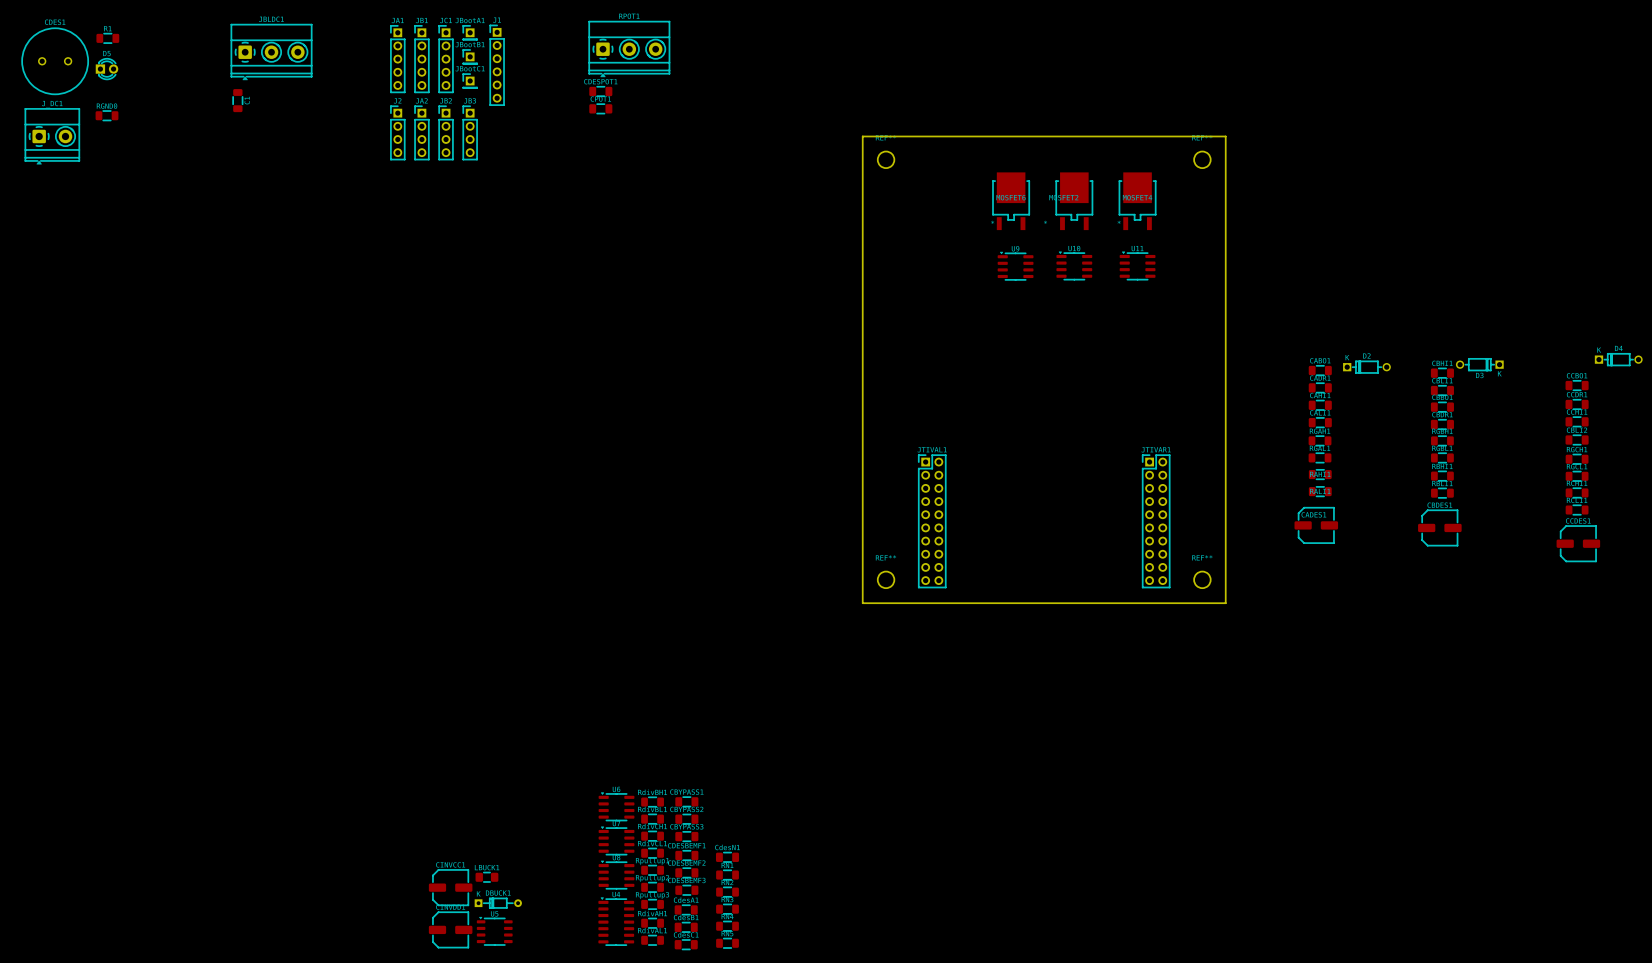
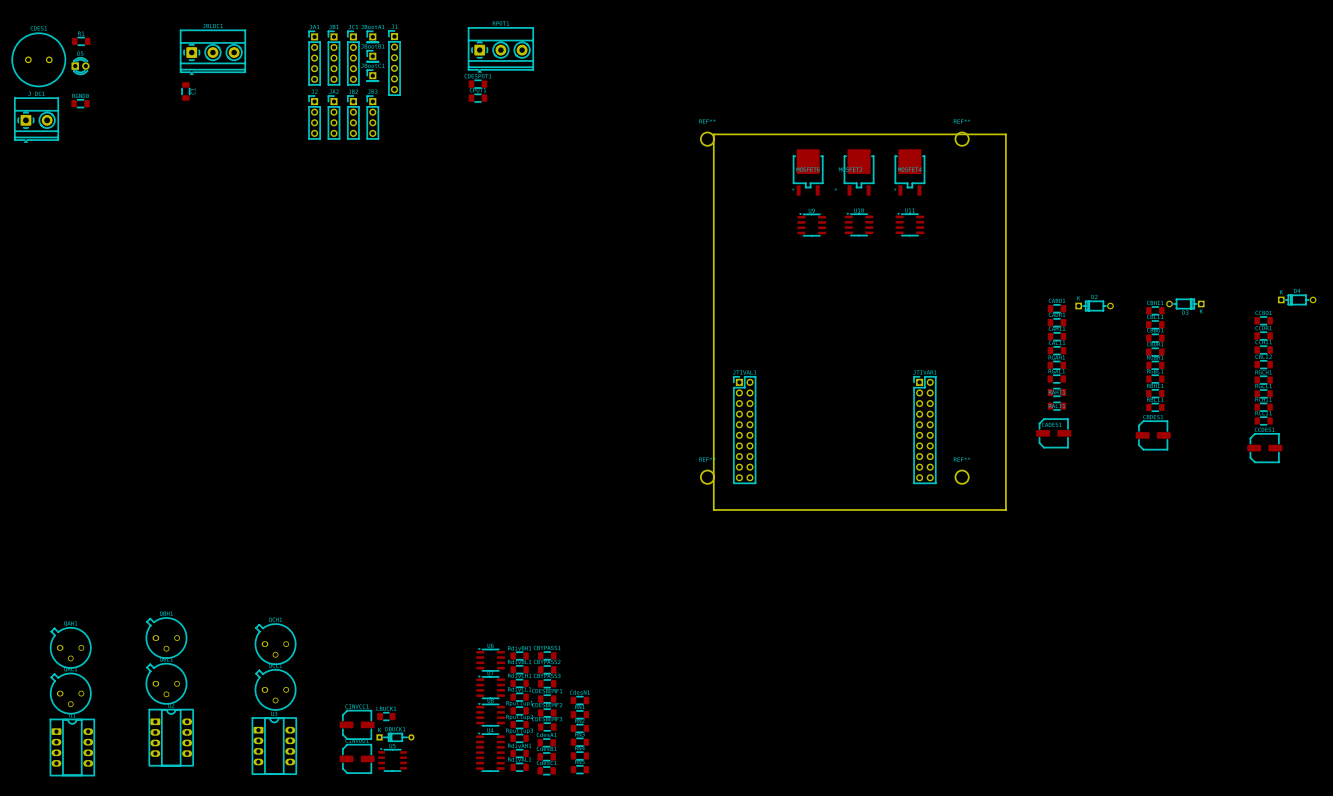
board edge: (862, 136) (1225, 136) (1225, 603) (862, 603) (862, 136) -> (713, 134) (1005, 134) (1005, 509) (713, 509) (713, 134)
part: none -> (166, 638)
part: none -> (275, 644)
part: none -> (70, 647)
part: none -> (166, 683)
part: none -> (275, 689)
part: none -> (70, 693)
part: none -> (171, 737)
part: none -> (274, 746)
part: none -> (72, 747)

